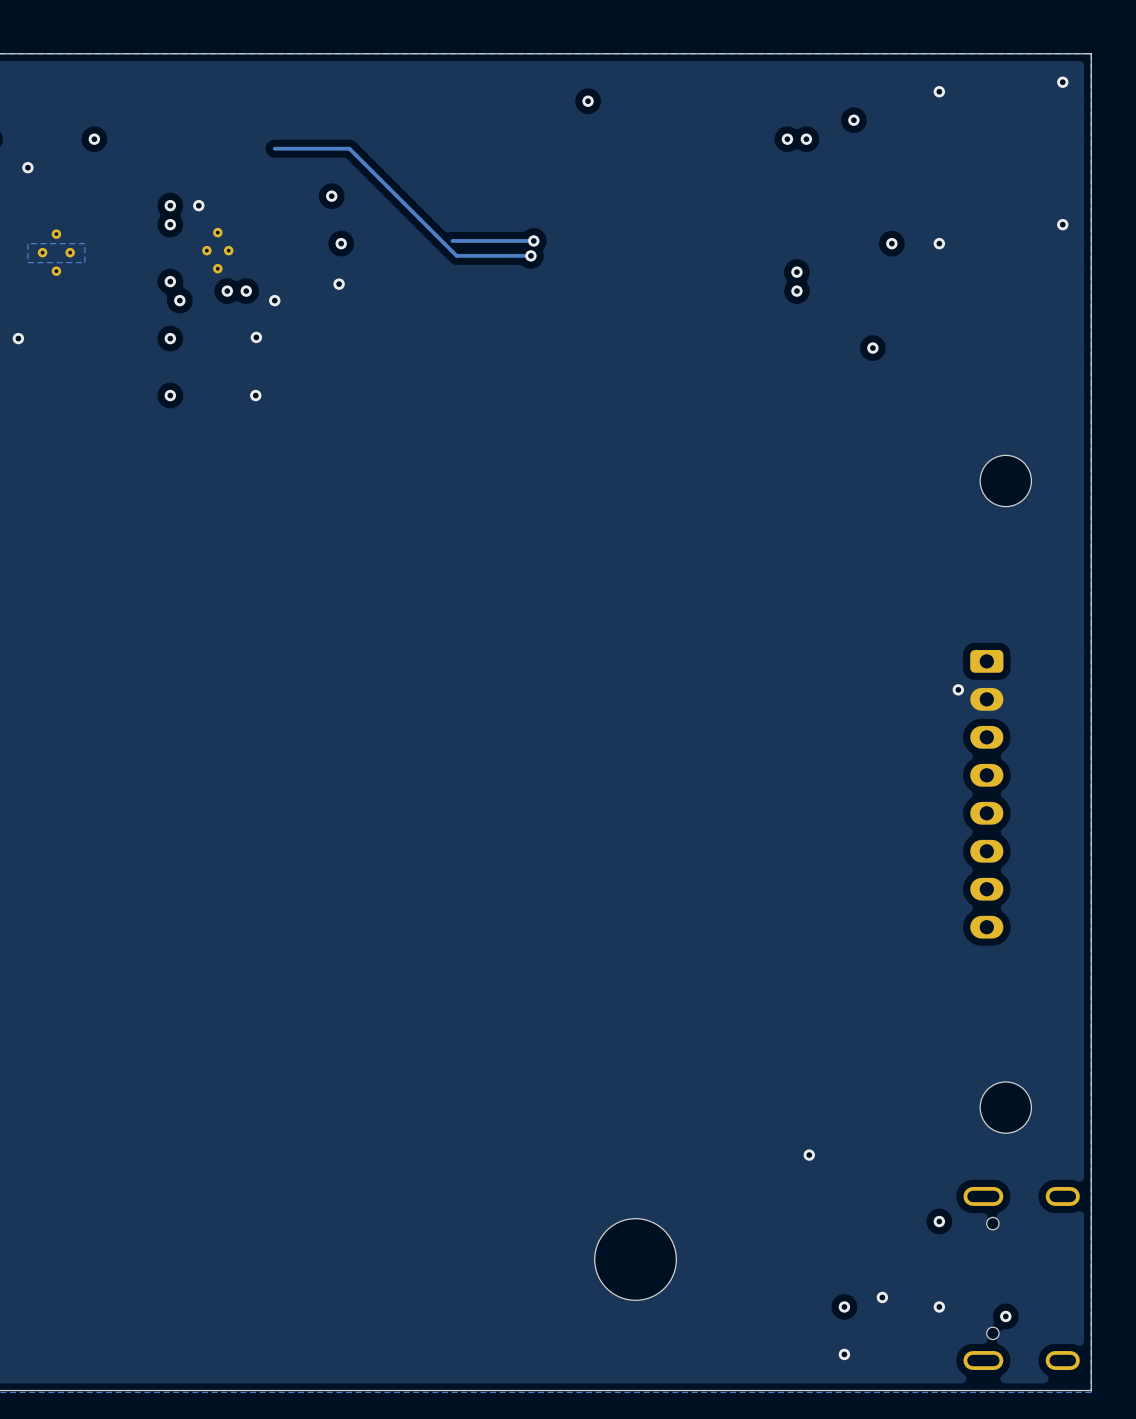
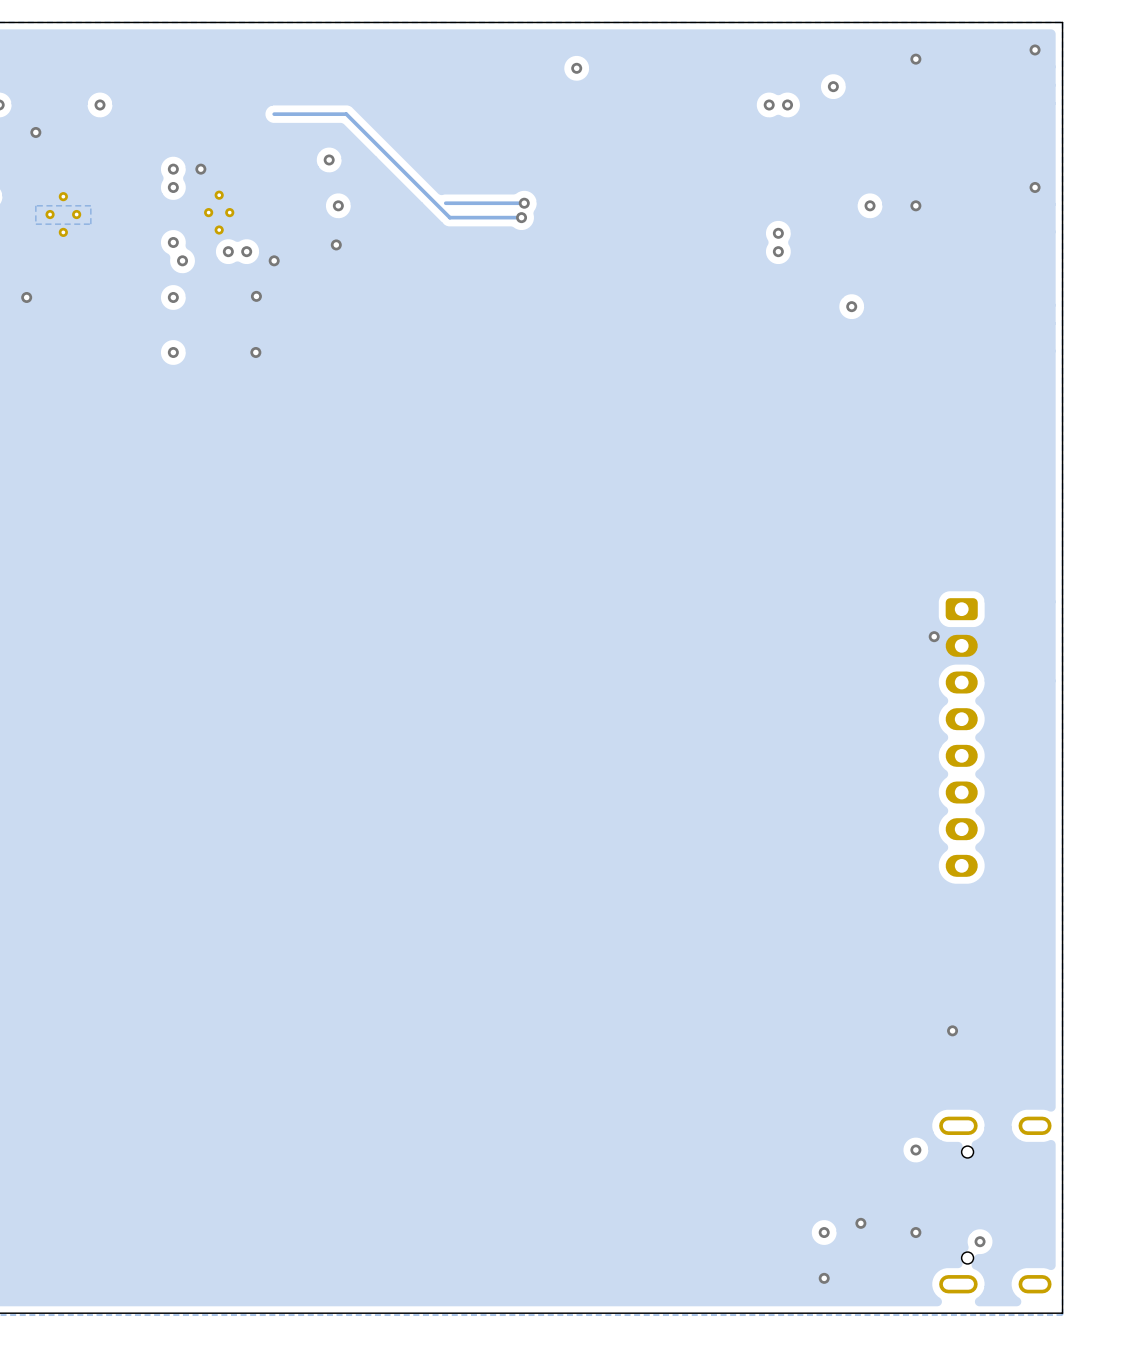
part: (1005, 480) -> none
via: none -> (952, 1030)
part: (1005, 1107) -> none
via: (809, 1155) -> none
part: (635, 1259) -> none

